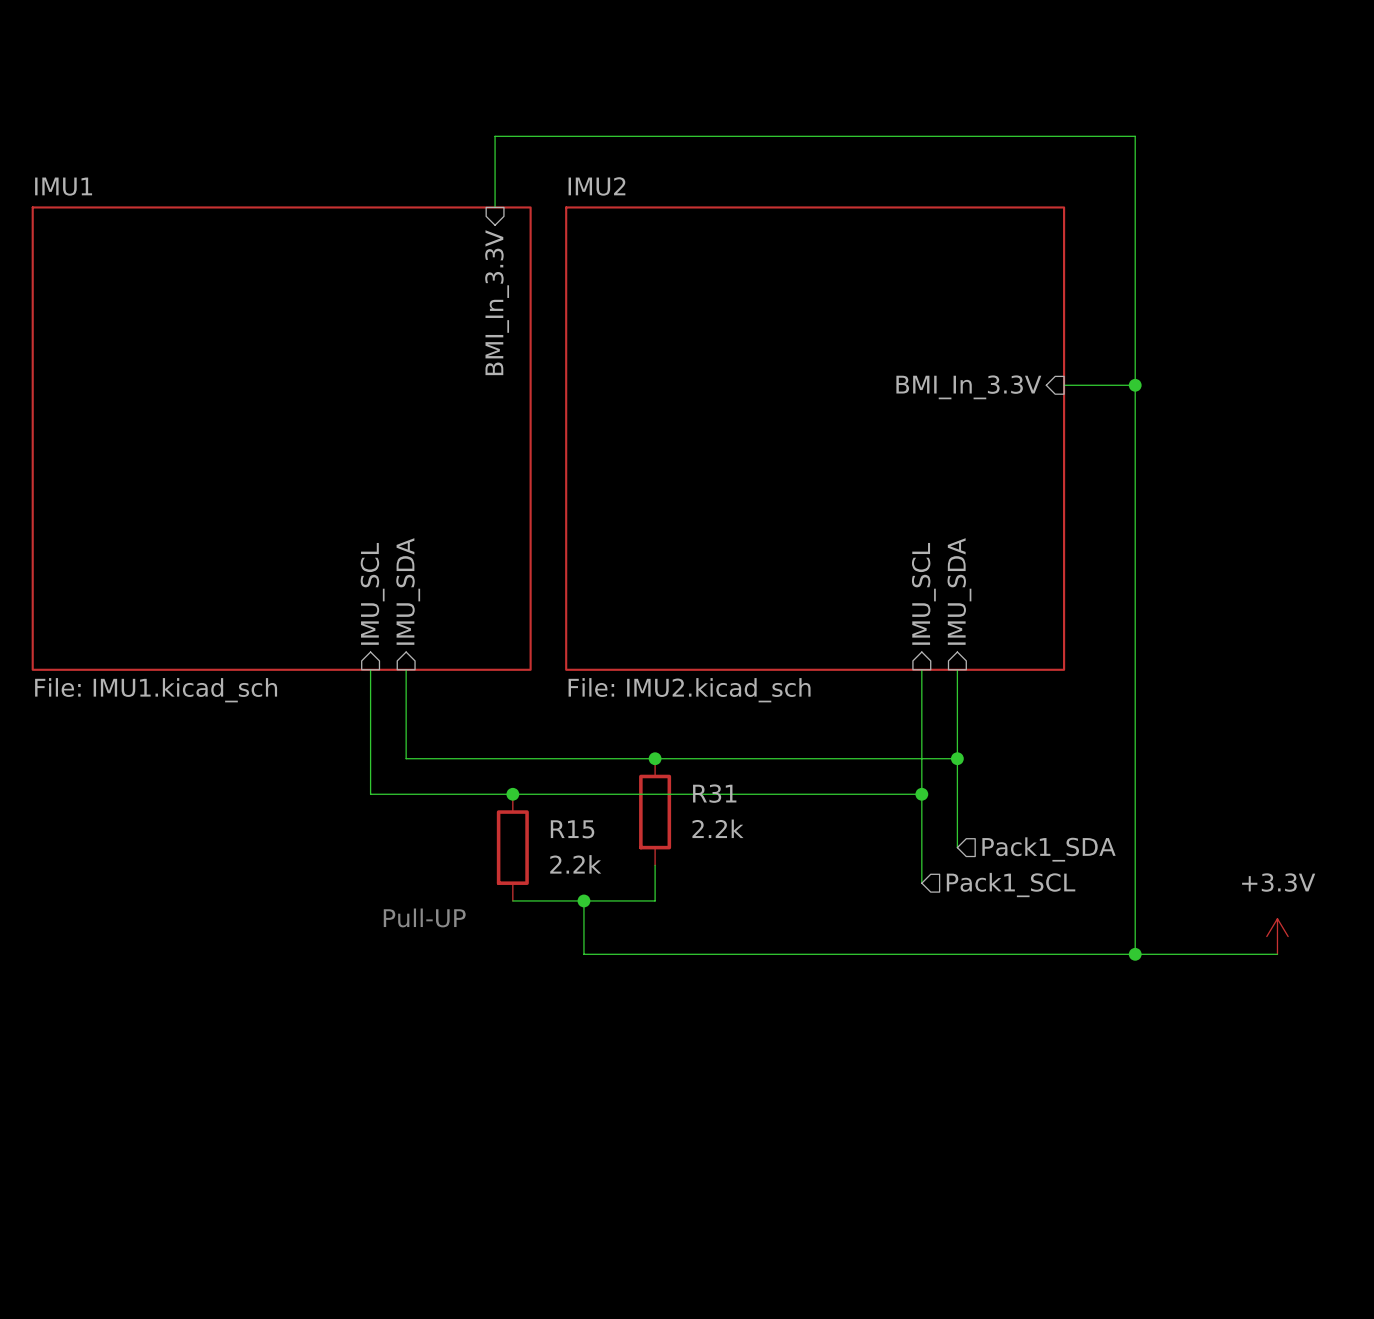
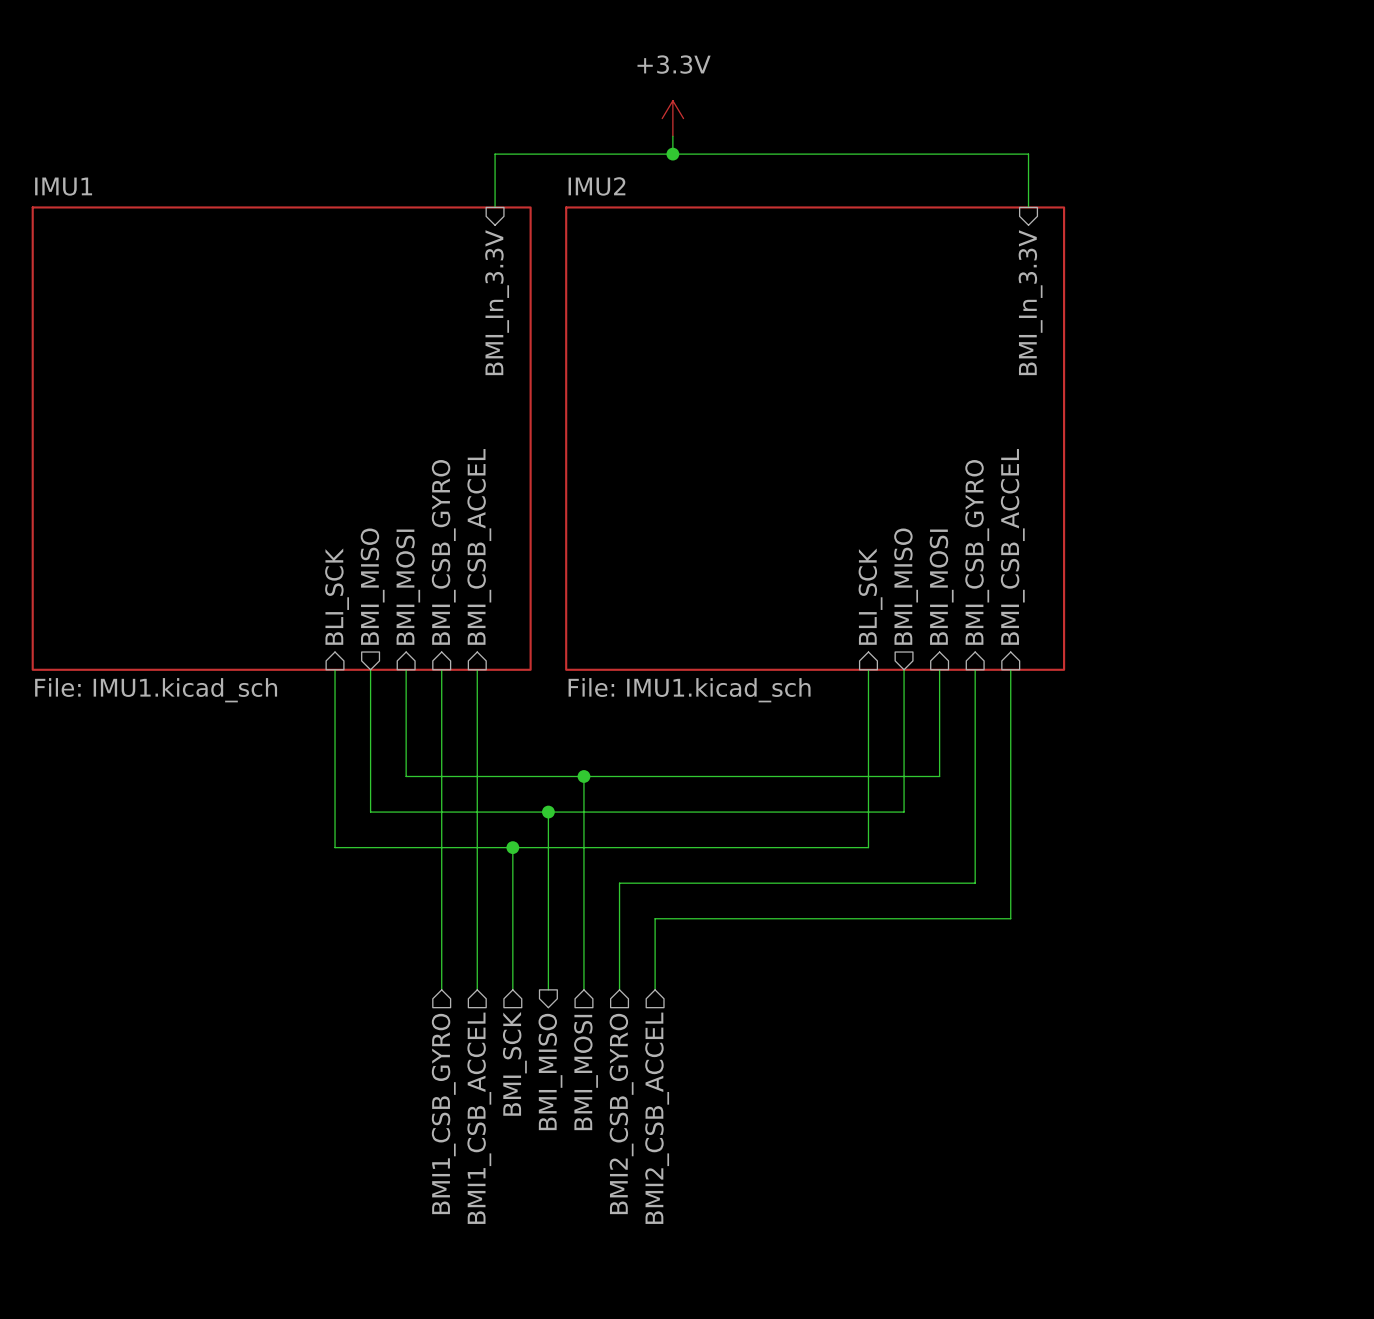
power symbol: none -> +3.3V (672, 118)
wire: none -> (672, 136) (672, 154)
wire: (495, 154) (495, 136) (1135, 136) (1135, 954) -> (495, 154) (1028, 154) (1028, 207)
junction: none -> (672, 154)
wire: (1064, 385) (1135, 385) -> none
junction: (1135, 385) -> none
sheet pin rotation: 0° (968, 387) -> 90° counterclockwise (1030, 302)
sheet pin: none -> BMI_CSB_ACCEL (479, 546)
sheet pin: none -> BMI_CSB_ACCEL (1012, 546)
sheet pin: none -> BMI_CSB_GYRO (443, 552)
sheet pin: none -> BMI_CSB_GYRO (977, 552)
sheet pin: none -> BMI_MISO (906, 586)
sheet pin: none -> BMI_MOSI (941, 587)
sheet pin: IMU_SDA (408, 591) -> BMI_MOSI (408, 587)
sheet pin: IMU_SDA (959, 591) -> none
sheet pin shape: input (372, 593) -> output (372, 586)
sheet pin: IMU_SCL (372, 593) -> BMI_MISO (372, 586)
sheet pin: IMU_SCL (923, 593) -> none
sheet pin: none -> BLI_SCK (337, 596)
sheet pin: none -> BLI_SCK (870, 596)
wire: none -> (335, 669) (335, 847) (868, 847) (868, 669)
wire: none -> (441, 669) (441, 989)
wire: none -> (477, 669) (477, 989)
wire: (921, 669) (921, 883) -> none
wire: (957, 669) (957, 847) -> none
wire: none -> (975, 669) (975, 883) (619, 883) (619, 989)
wire: none -> (1010, 669) (1010, 918) (655, 918) (655, 989)
sheet IMU2 value: File: IMU2.kicad_sch (689, 690) -> File: IMU1.kicad_sch (689, 690)
wire: (406, 758) (957, 758) -> (406, 758) (406, 776) (939, 776) (939, 669)
junction: (655, 758) -> none
junction: (957, 758) -> none
wire: none -> (583, 776) (583, 900)
junction: none -> (583, 776)
wire: (370, 794) (921, 794) -> (370, 794) (370, 812) (904, 812) (904, 669)
junction: (512, 794) -> none
junction: (921, 794) -> none
wire: none -> (548, 812) (548, 989)
junction: none -> (548, 812)
R31: 2.2k (655, 812) -> none
wire: none -> (512, 847) (512, 989)
junction: none -> (512, 847)
R15: 2.2k (512, 847) -> none
hierarchical label: Pack1_SDA (1048, 849) -> none
wire: (655, 865) (655, 900) (512, 900) -> none
hierarchical label: Pack1_SCL (1011, 885) -> none
junction: (583, 900) -> none
text: Pull-UP (424, 917) -> none
power symbol: +3.3V (1277, 936) -> none
wire: (583, 954) (1277, 954) -> (583, 954) (583, 989)
junction: (1135, 954) -> none
hierarchical label: none -> BMI_SCK (514, 1063)
hierarchical label: none -> BMI_MISO (550, 1071)
hierarchical label: none -> BMI_MOSI (586, 1072)
hierarchical label: none -> BMI1_CSB_GYRO (443, 1113)
hierarchical label: none -> BMI2_CSB_GYRO (621, 1113)
hierarchical label: none -> BMI1_CSB_ACCEL (479, 1118)
hierarchical label: none -> BMI2_CSB_ACCEL (657, 1118)

